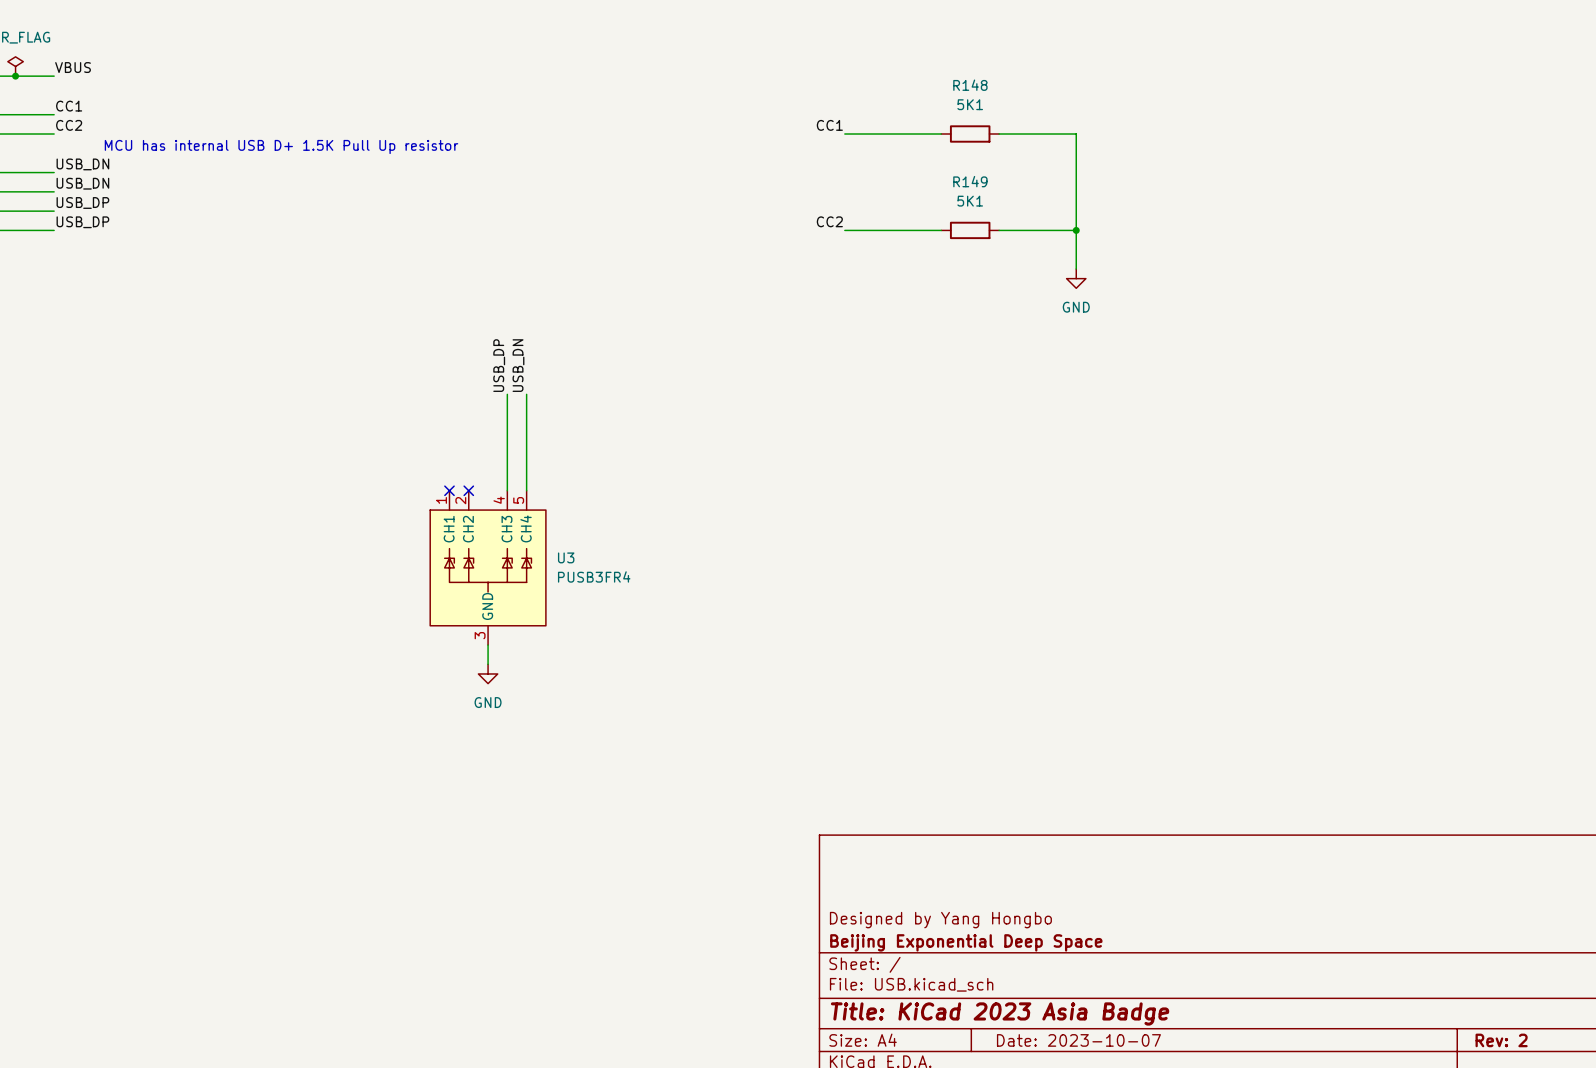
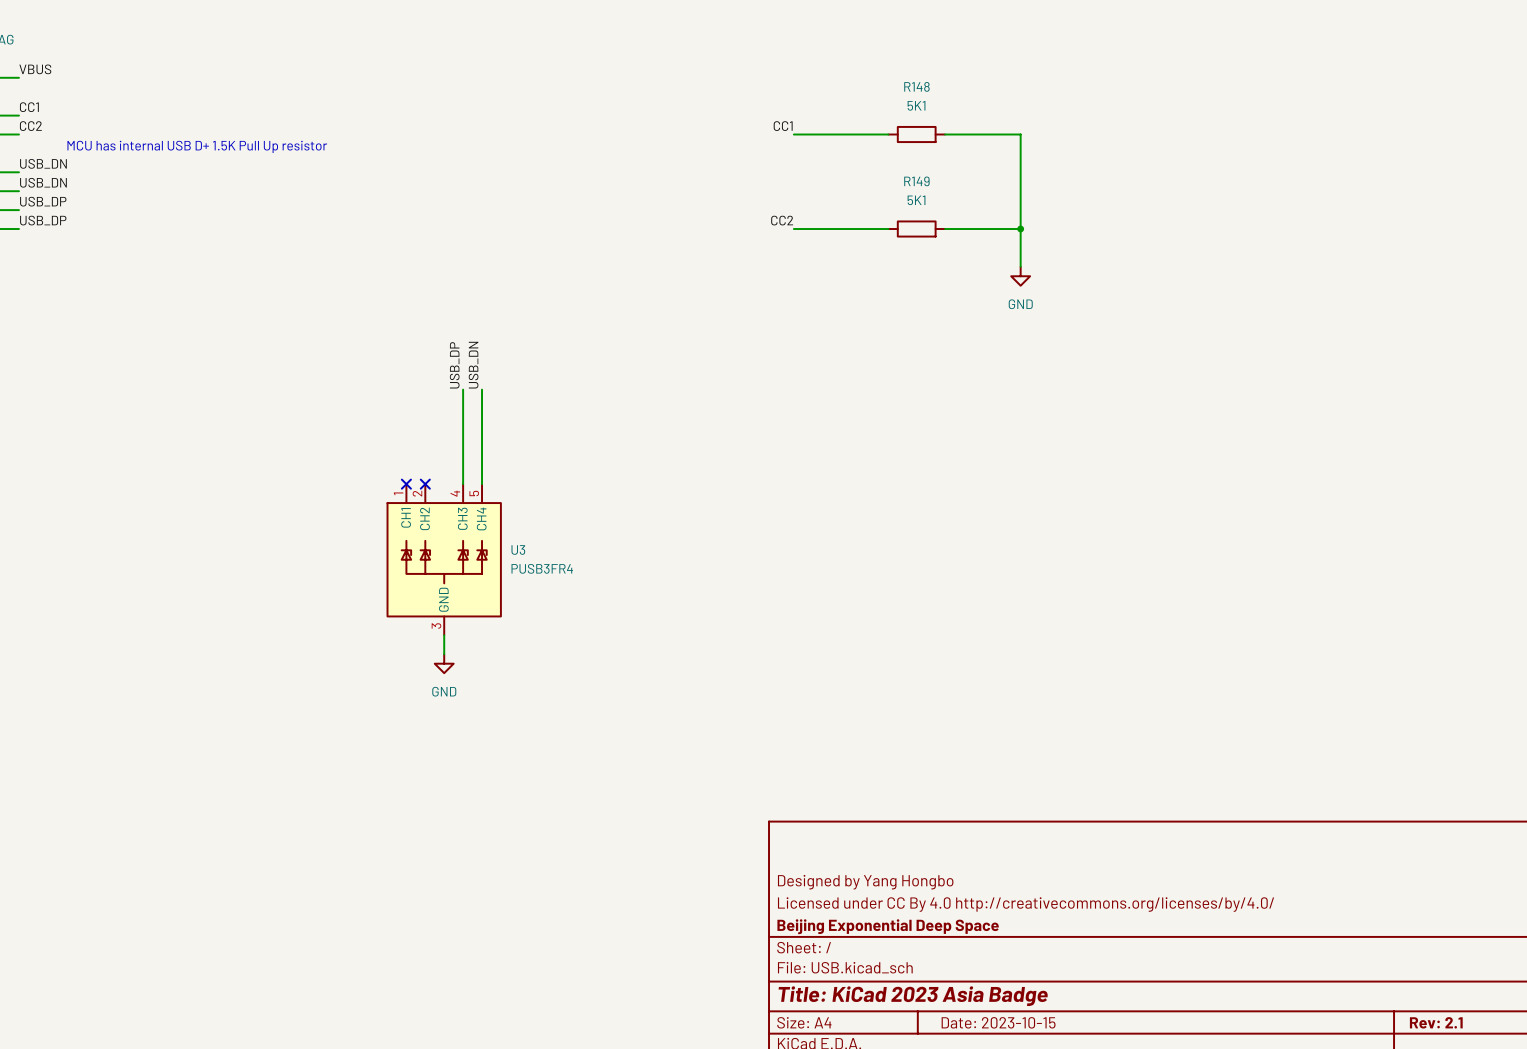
title block: none -> Designed by Yang Hongbo (865, 882)
title block: Designed by Yang Hongbo (940, 920) -> Licensed under CC By 4.0 http://creativecommons.org/licenses/by/4.0/ (1026, 904)
title block: Date: 2023-10-07 (1078, 1040) -> Date: 2023-10-15 (998, 1022)
title block: Rev: 2 (1501, 1040) -> Rev: 2.1 (1436, 1022)

